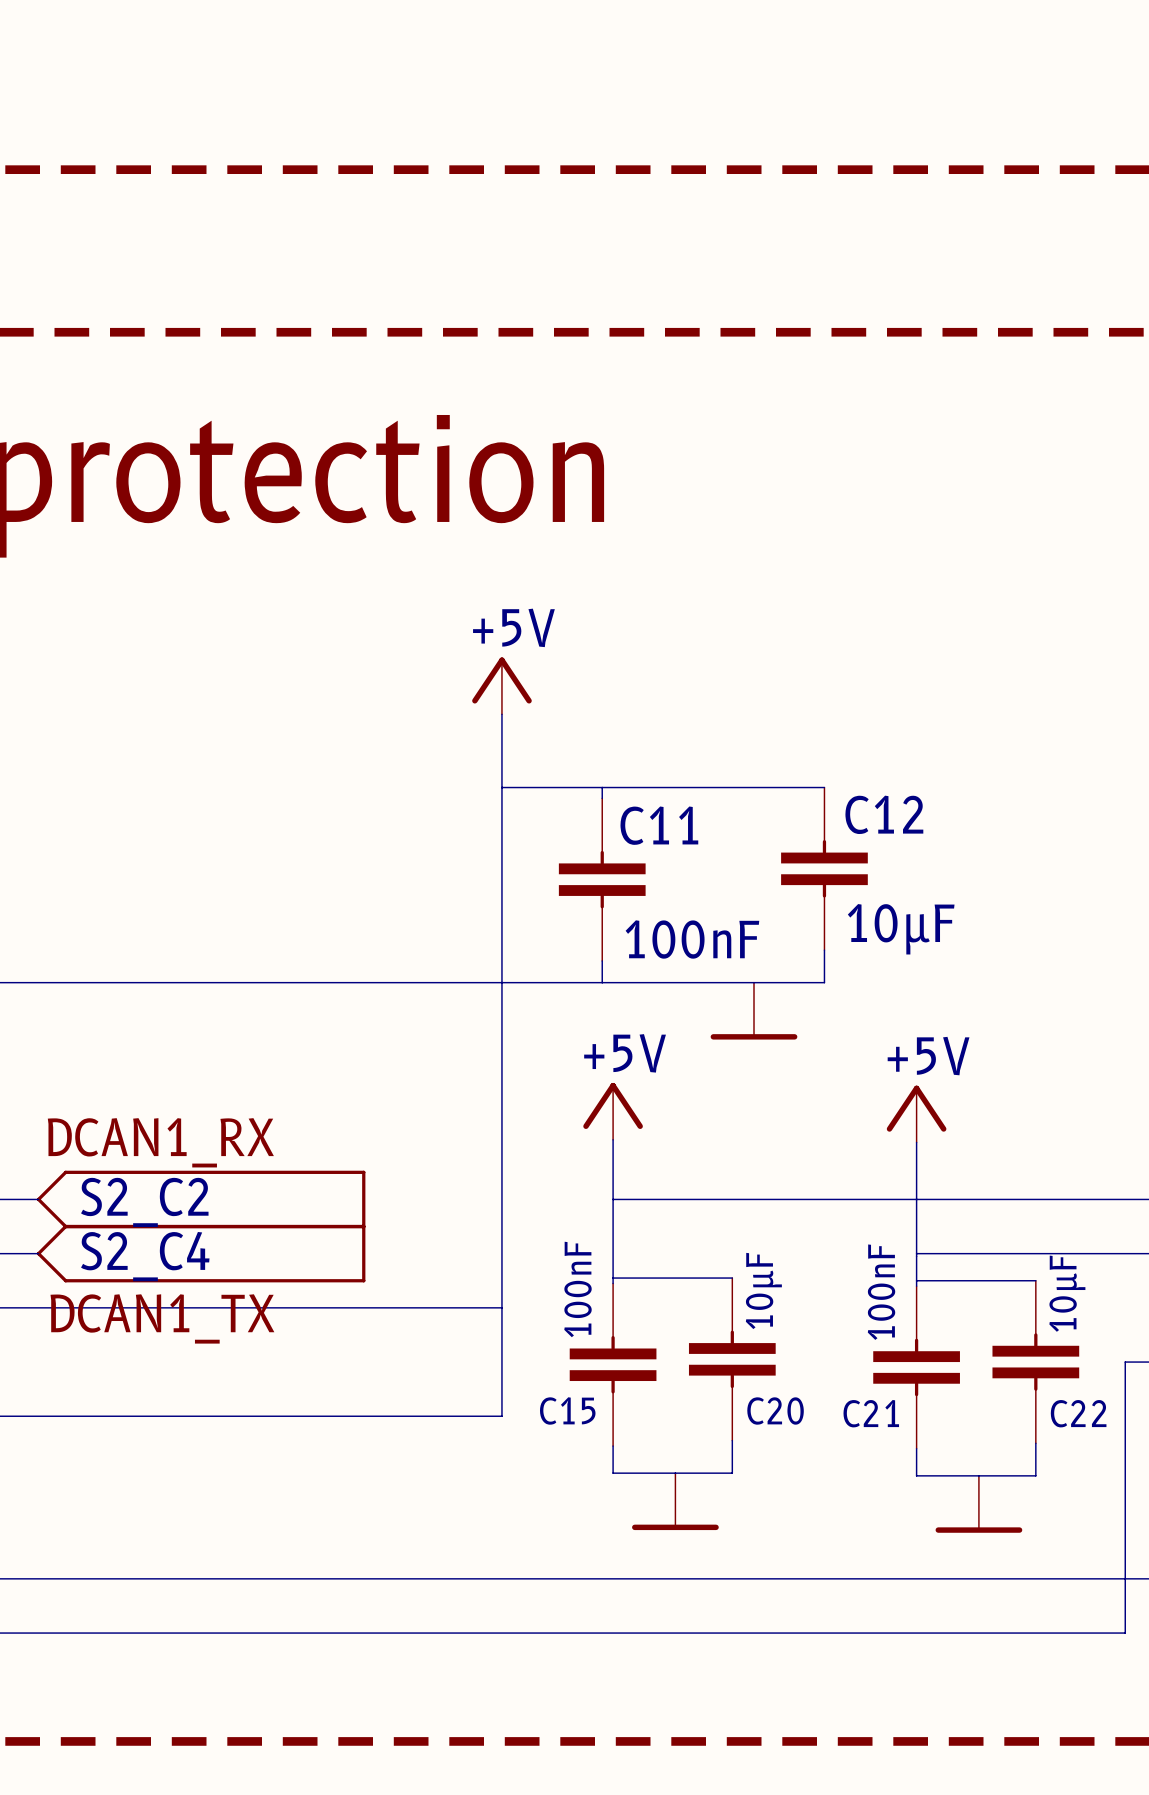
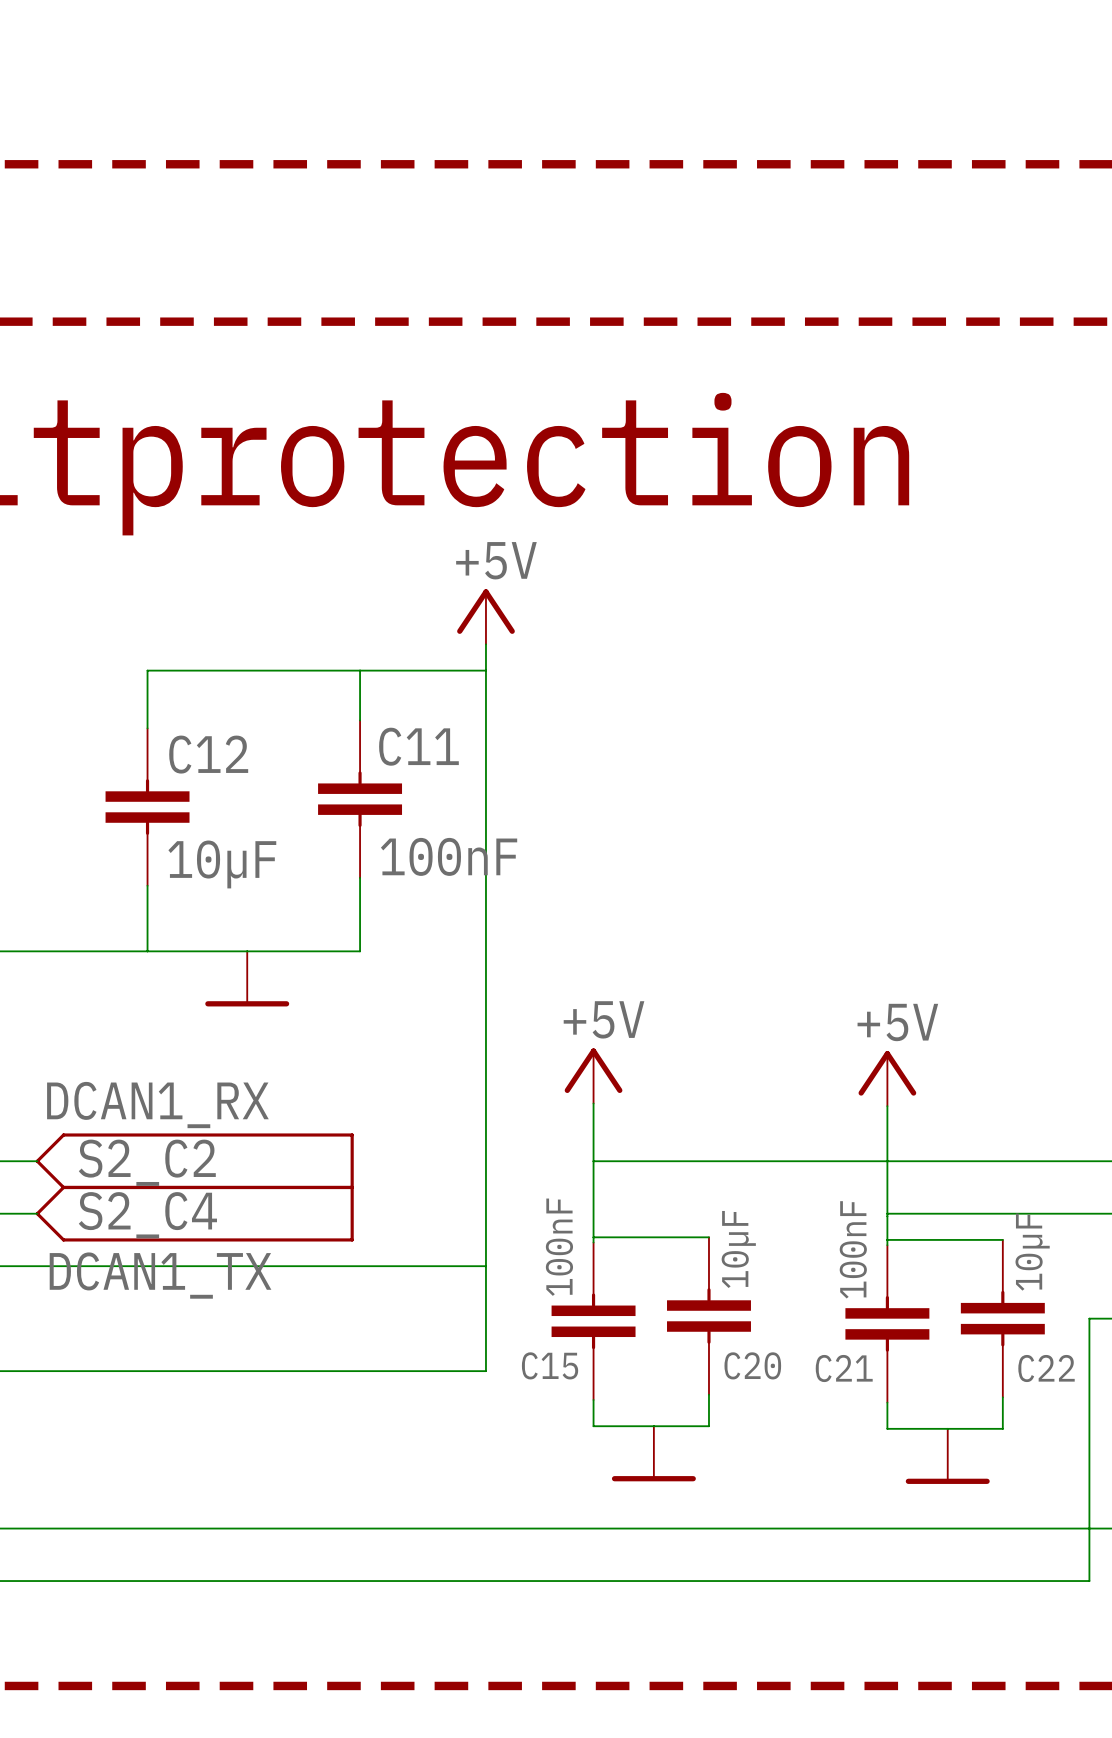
power symbol position: +5V (501, 685) -> +5V (485, 616)
wire: none -> (360, 670) (360, 720)
wire: none -> (485, 670) (147, 670) (147, 728)
wire: (501, 787) (824, 787) -> none
wire: (602, 787) (602, 798) -> none
C12 position: (824, 868) -> (147, 807)
C11 position: (602, 879) -> (360, 799)
wire: none -> (147, 885) (147, 951)
wire: (824, 950) (824, 982) (371, 982) -> (360, 877) (360, 951)
wire: (602, 960) (602, 982) -> none
power symbol position: (754, 1011) -> (247, 978)

